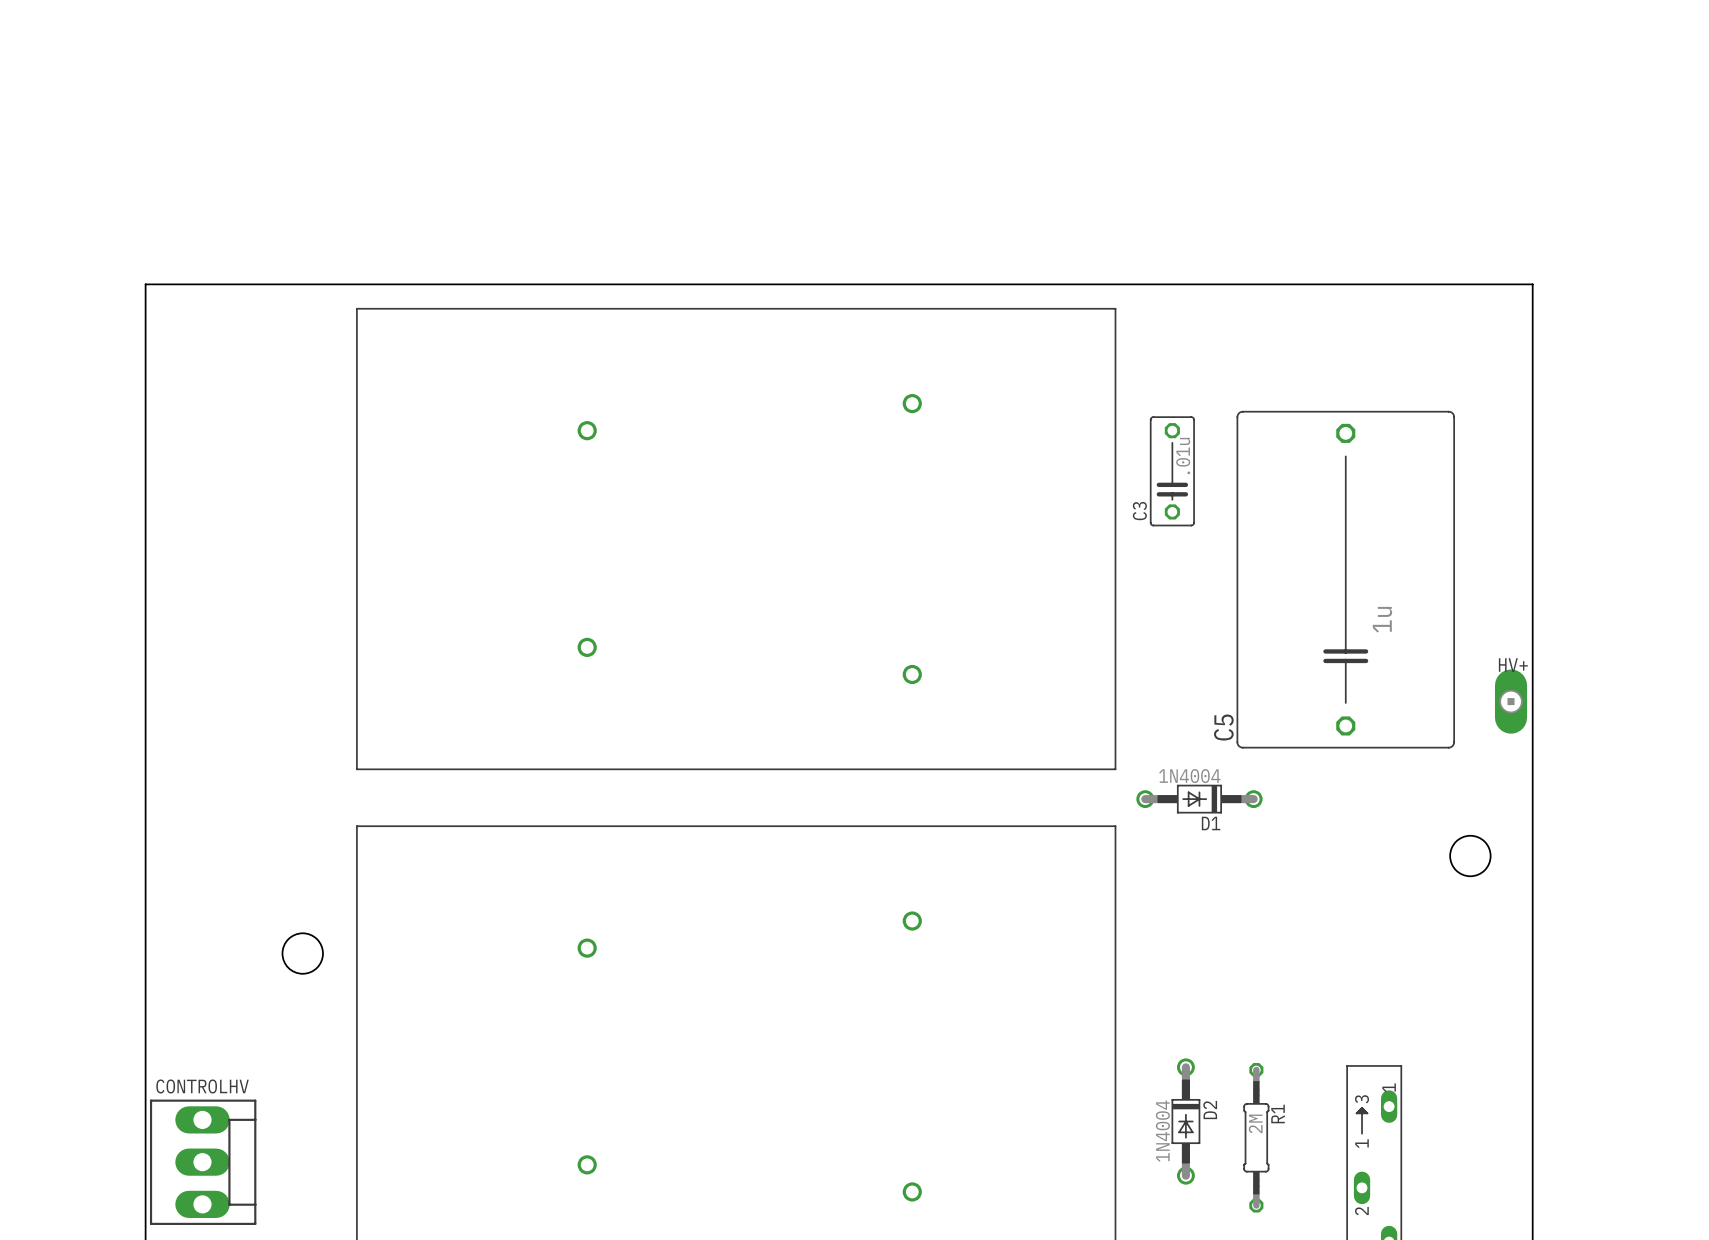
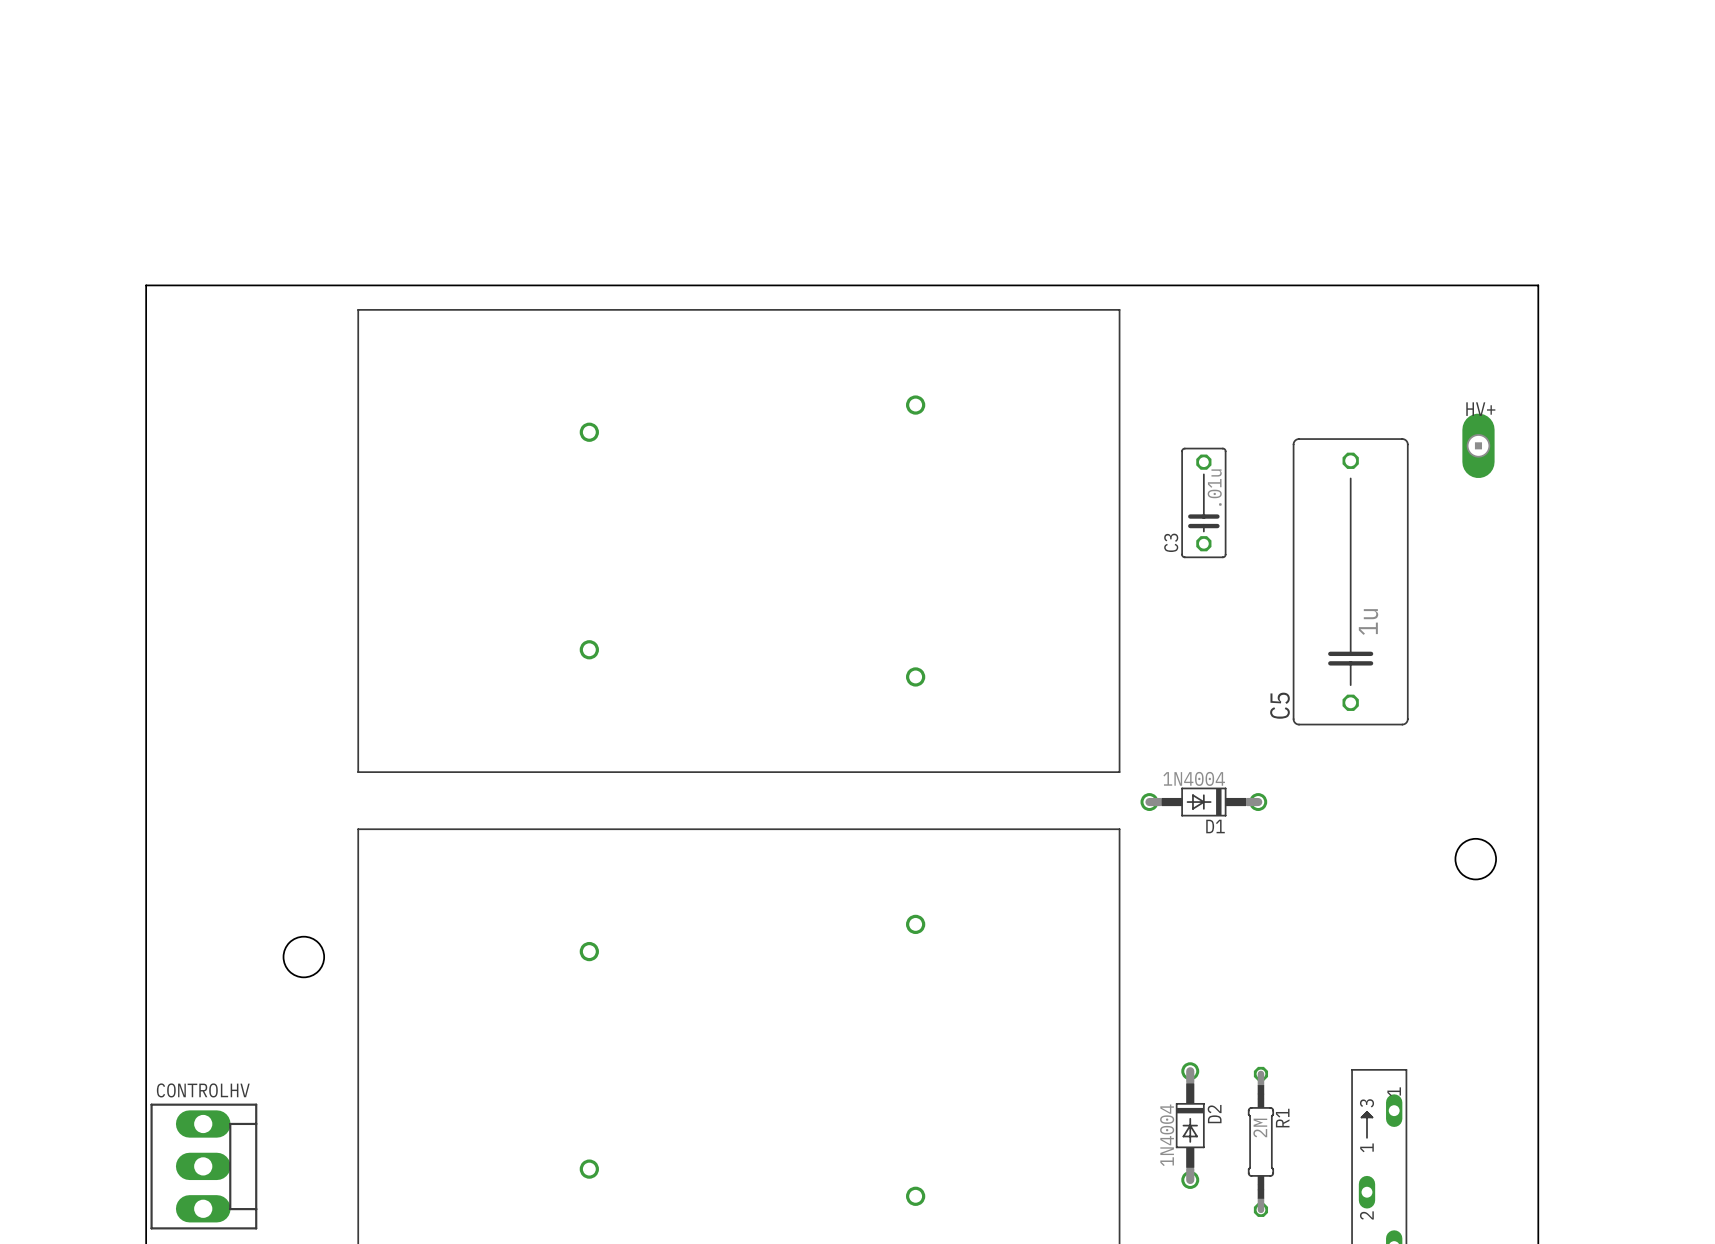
C5 footprint: [1236, 410, 1455, 749] -> [1292, 438, 1409, 726]
C3 position: (1172, 471) -> (1203, 502)
HV+ position: (1511, 701) -> (1478, 445)
C5 name position: C5 (1223, 727) -> C5 (1279, 705)

